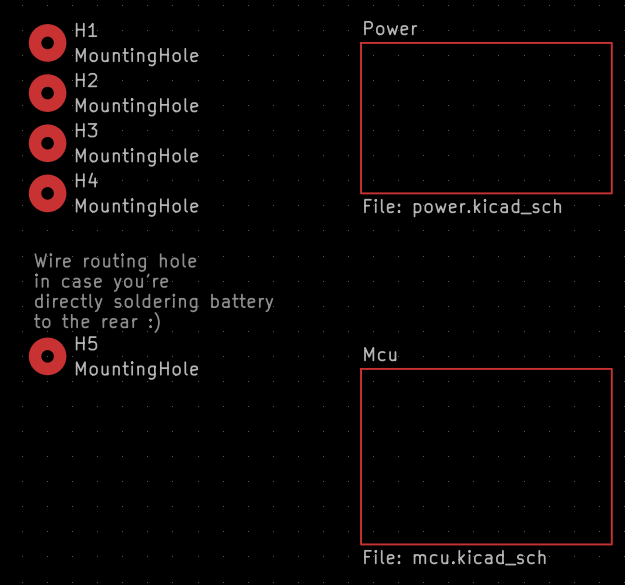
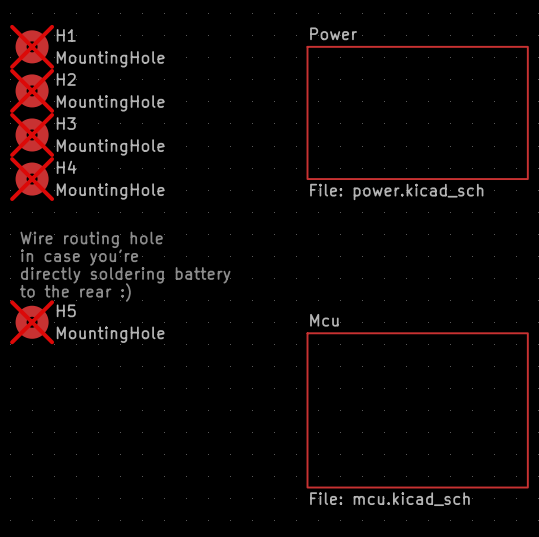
H1 do-not-place cross: none -> (32, 46)
H2 do-not-place cross: none -> (32, 90)
H3 do-not-place cross: none -> (32, 134)
H4 do-not-place cross: none -> (32, 179)
H5 do-not-place cross: none -> (32, 322)

